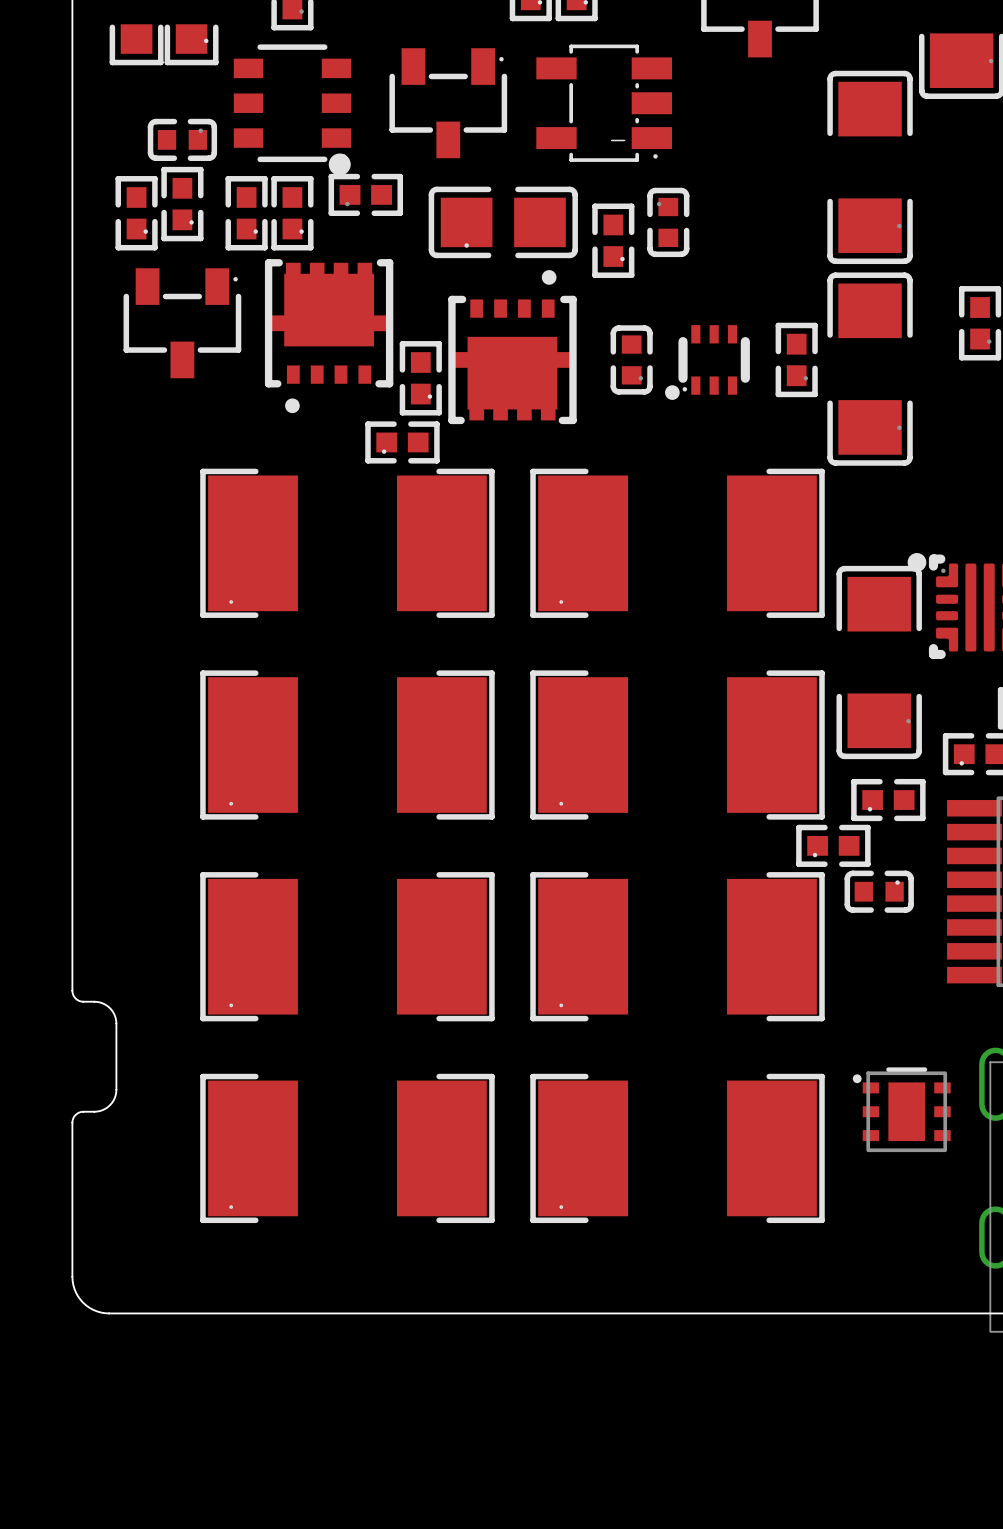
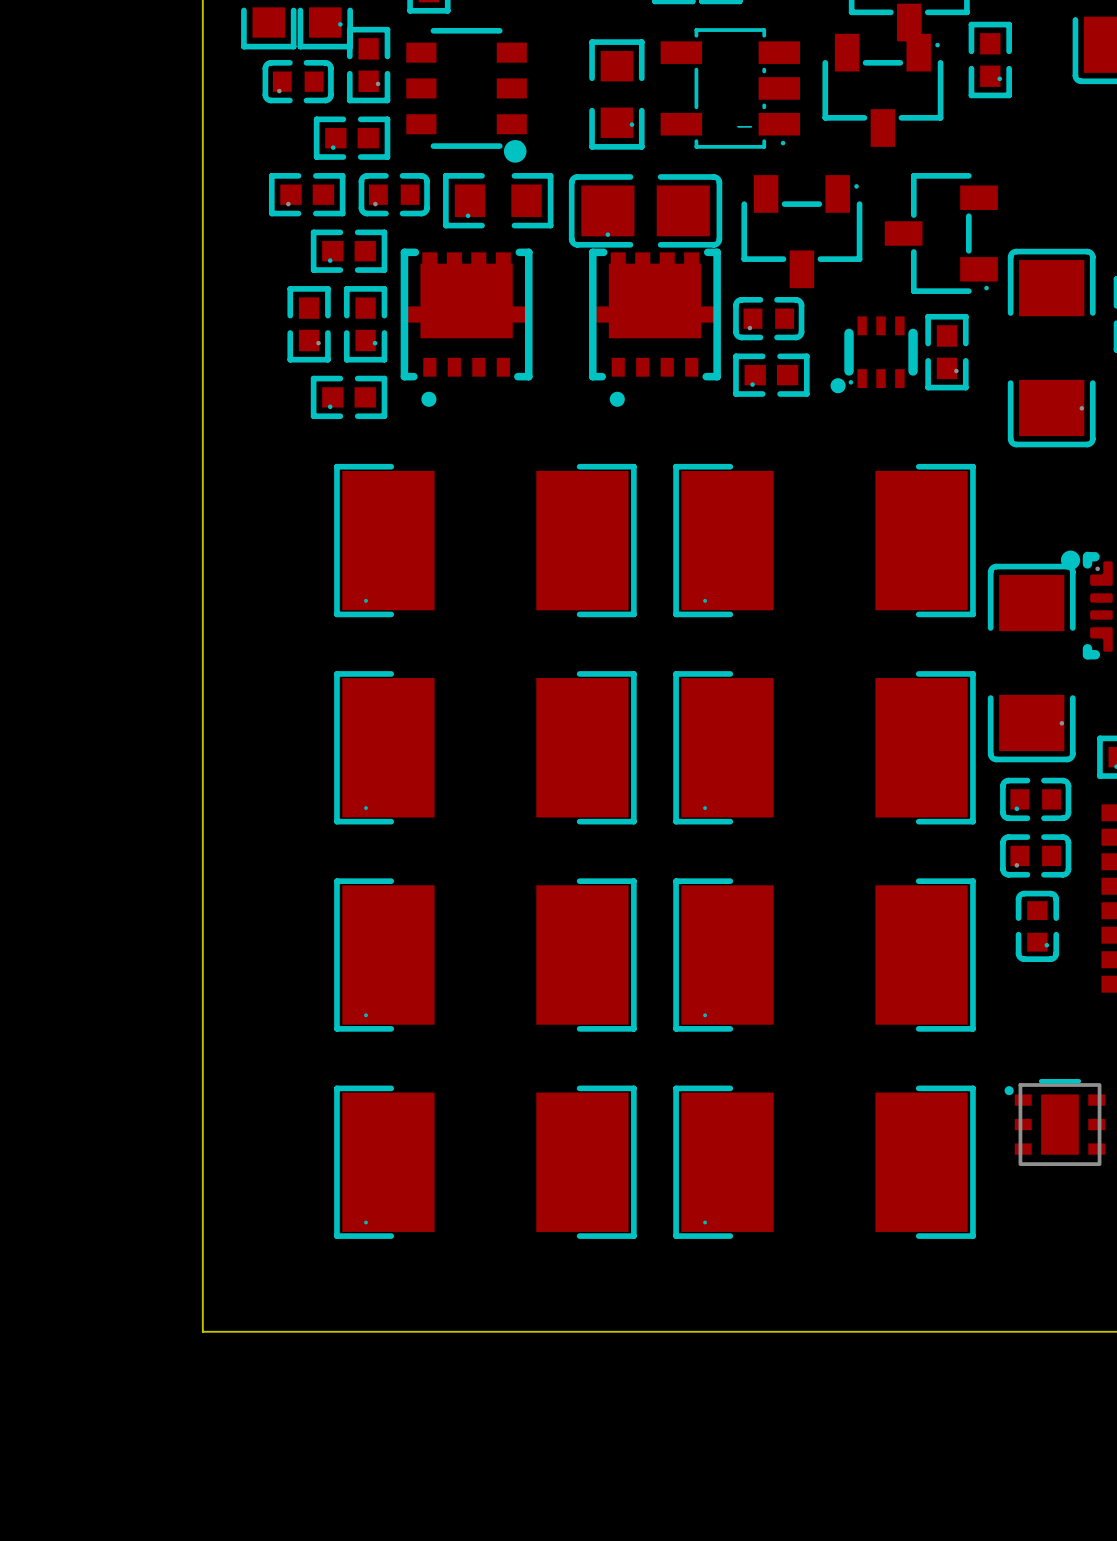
part footprint: [389, 48, 508, 159] -> [589, 39, 645, 150]
part: none -> (990, 59)
part: none -> (368, 65)
part position: (604, 103) -> (730, 88)
part: none -> (882, 90)
part position: (292, 109) -> (466, 95)
part rotation: 0° (182, 139) -> 180° (298, 81)
part position: (182, 139) -> (298, 81)
part: none -> (352, 138)
part footprint: [161, 166, 204, 242] -> [268, 173, 346, 217]
part: (870, 167) -> none
part footprint: [328, 173, 404, 217] -> [443, 173, 554, 229]
part footprint: [225, 176, 268, 251] -> [358, 173, 430, 217]
part: (136, 213) -> none
part: (292, 213) -> none
part: (668, 222) -> none
part: (613, 240) -> none
part: none -> (801, 231)
part: none -> (941, 233)
part: none -> (349, 251)
part footprint: [123, 268, 242, 379] -> [287, 286, 331, 363]
part: none -> (365, 324)
part rotation: 0° (512, 347) -> 180° (654, 327)
part rotation: 0° (631, 359) -> 90° clockwise (768, 318)
part position: (707, 362) -> (874, 354)
part position: (870, 369) -> (1051, 348)
part: (420, 378) -> none
part: none -> (771, 375)
part: none -> (349, 397)
part: (402, 442) -> none
part footprint: [851, 778, 926, 822] -> [1000, 777, 1072, 822]
part: (833, 845) -> none
part: none -> (1035, 855)
part rotation: 0° (879, 891) -> 90° clockwise (1037, 926)
board edge: (72, 990) (74, 997) (79, 1000) (99, 1002) (108, 1006) (114, 1014) (116, 1023) (114, 1098) (109, 1105) (102, 1110) (77, 1113) (72, 1122) -> (202, 1000) (202, 1135)
board edge: (72, 1276) (74, 1288) (83, 1302) (93, 1309) (109, 1313) -> (202, 1294) (202, 1331) (240, 1331)

